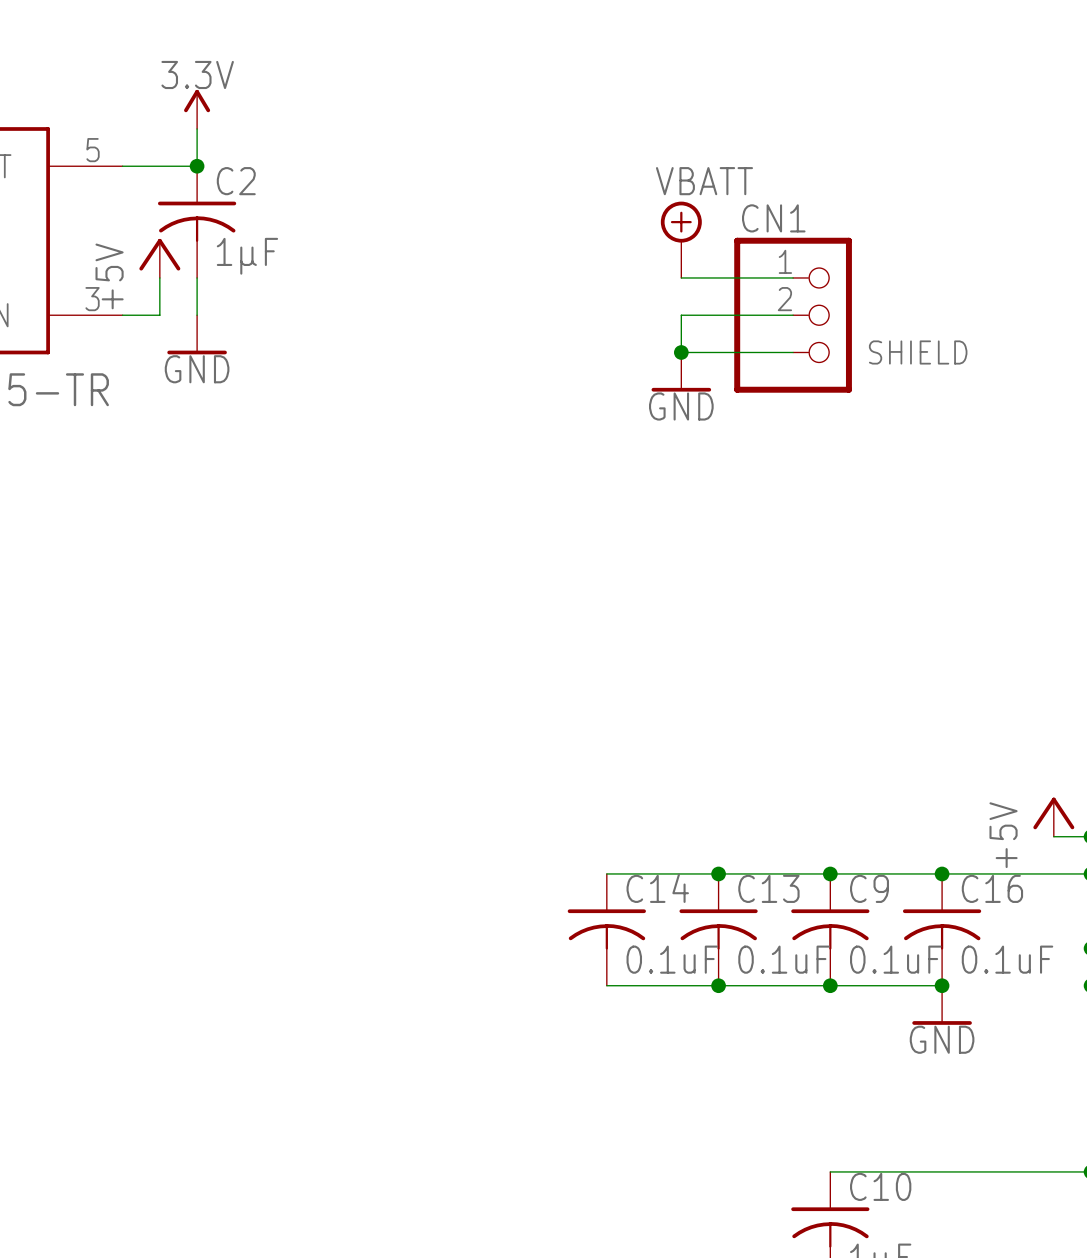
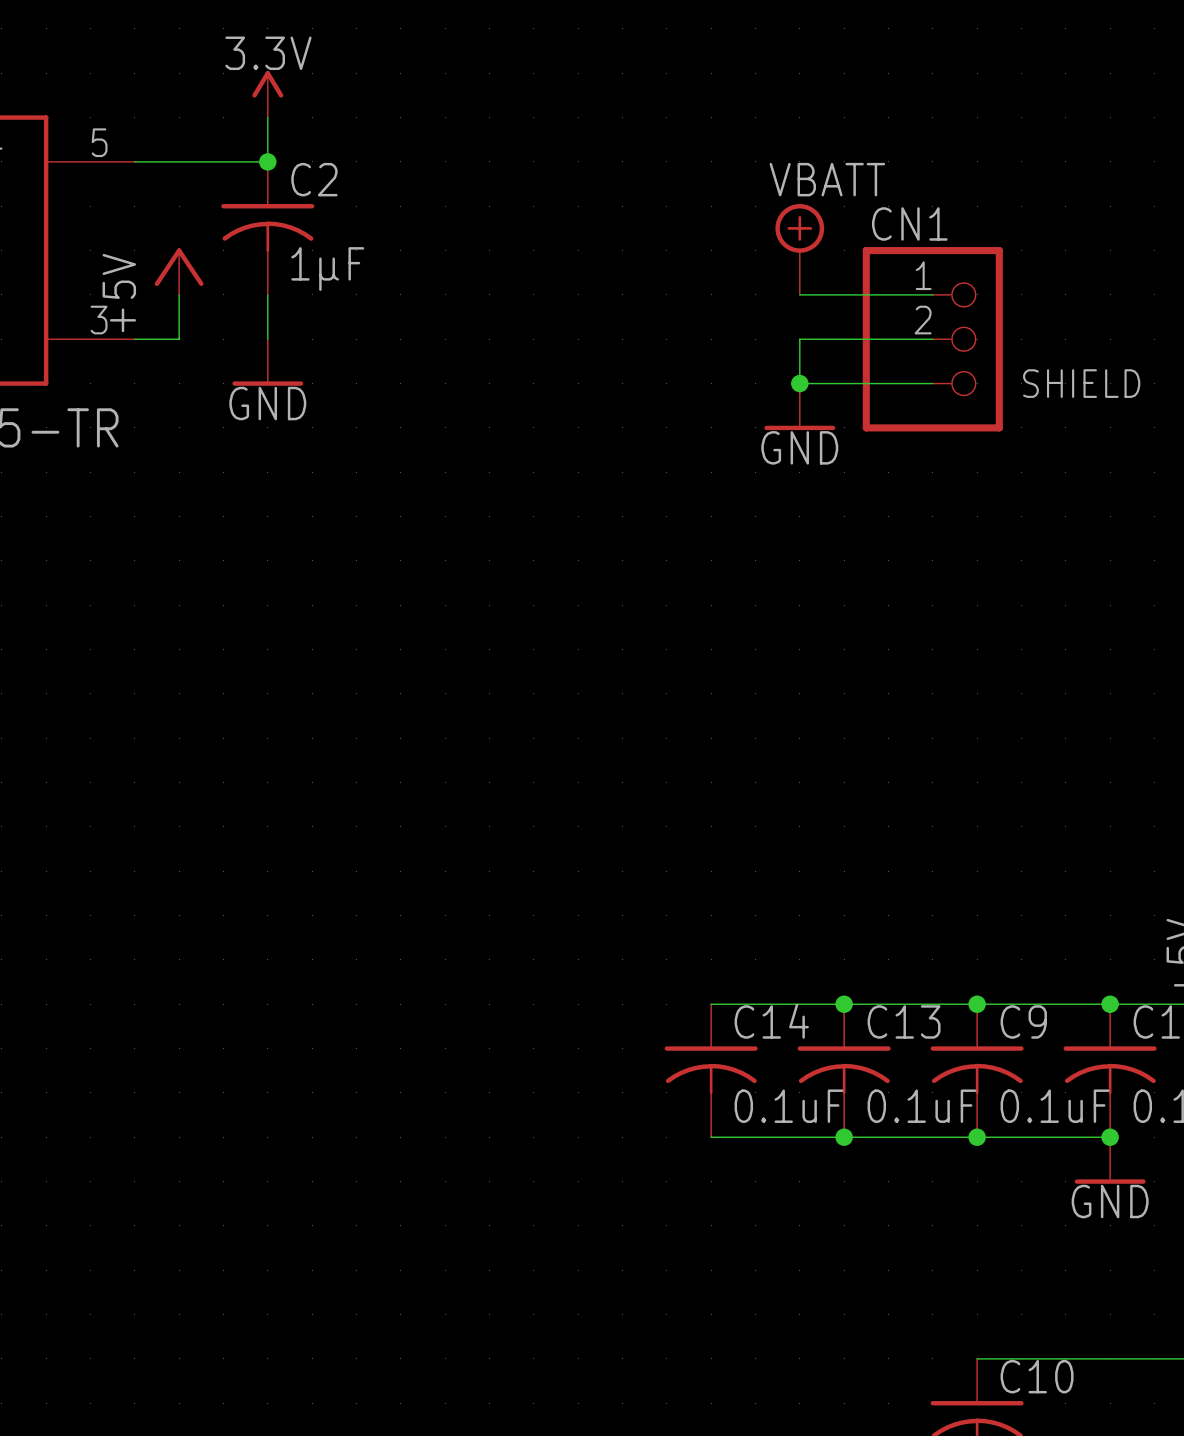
power symbol position: 3.3V (197, 109) -> 3.3V (267, 94)
wire: (197, 128) (197, 166) -> (267, 117) (267, 161) (223, 161)
junction position: (197, 166) -> (267, 161)
C2 position: (197, 222) -> (267, 228)
wire: (197, 277) (197, 315) -> (267, 294) (267, 339)
power symbol position: GND (197, 334) -> GND (267, 362)

